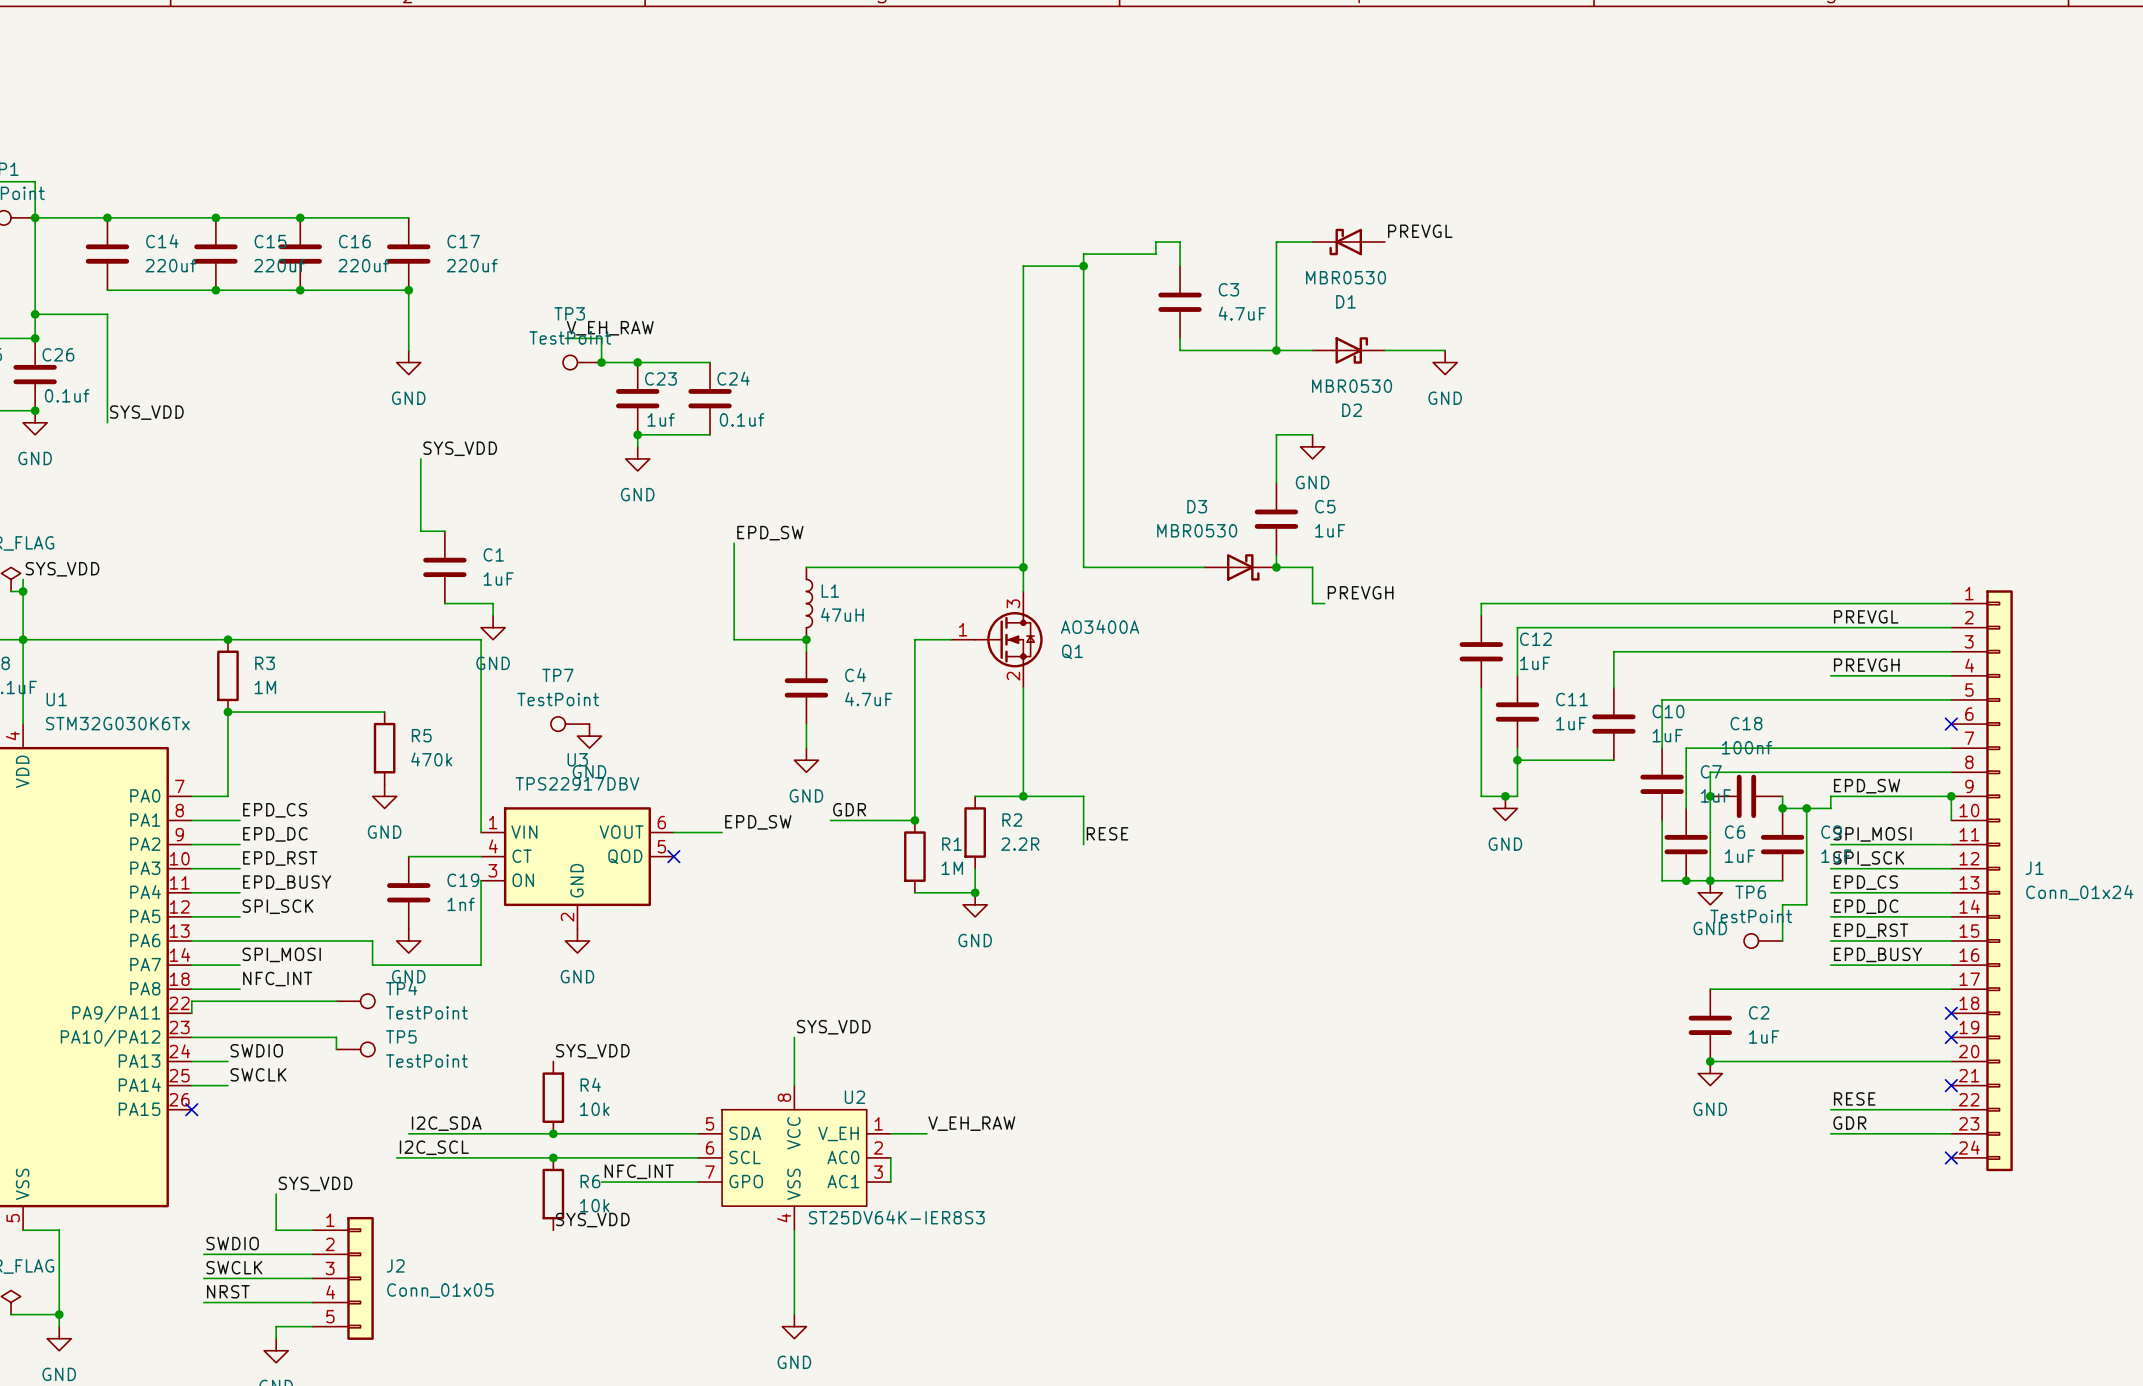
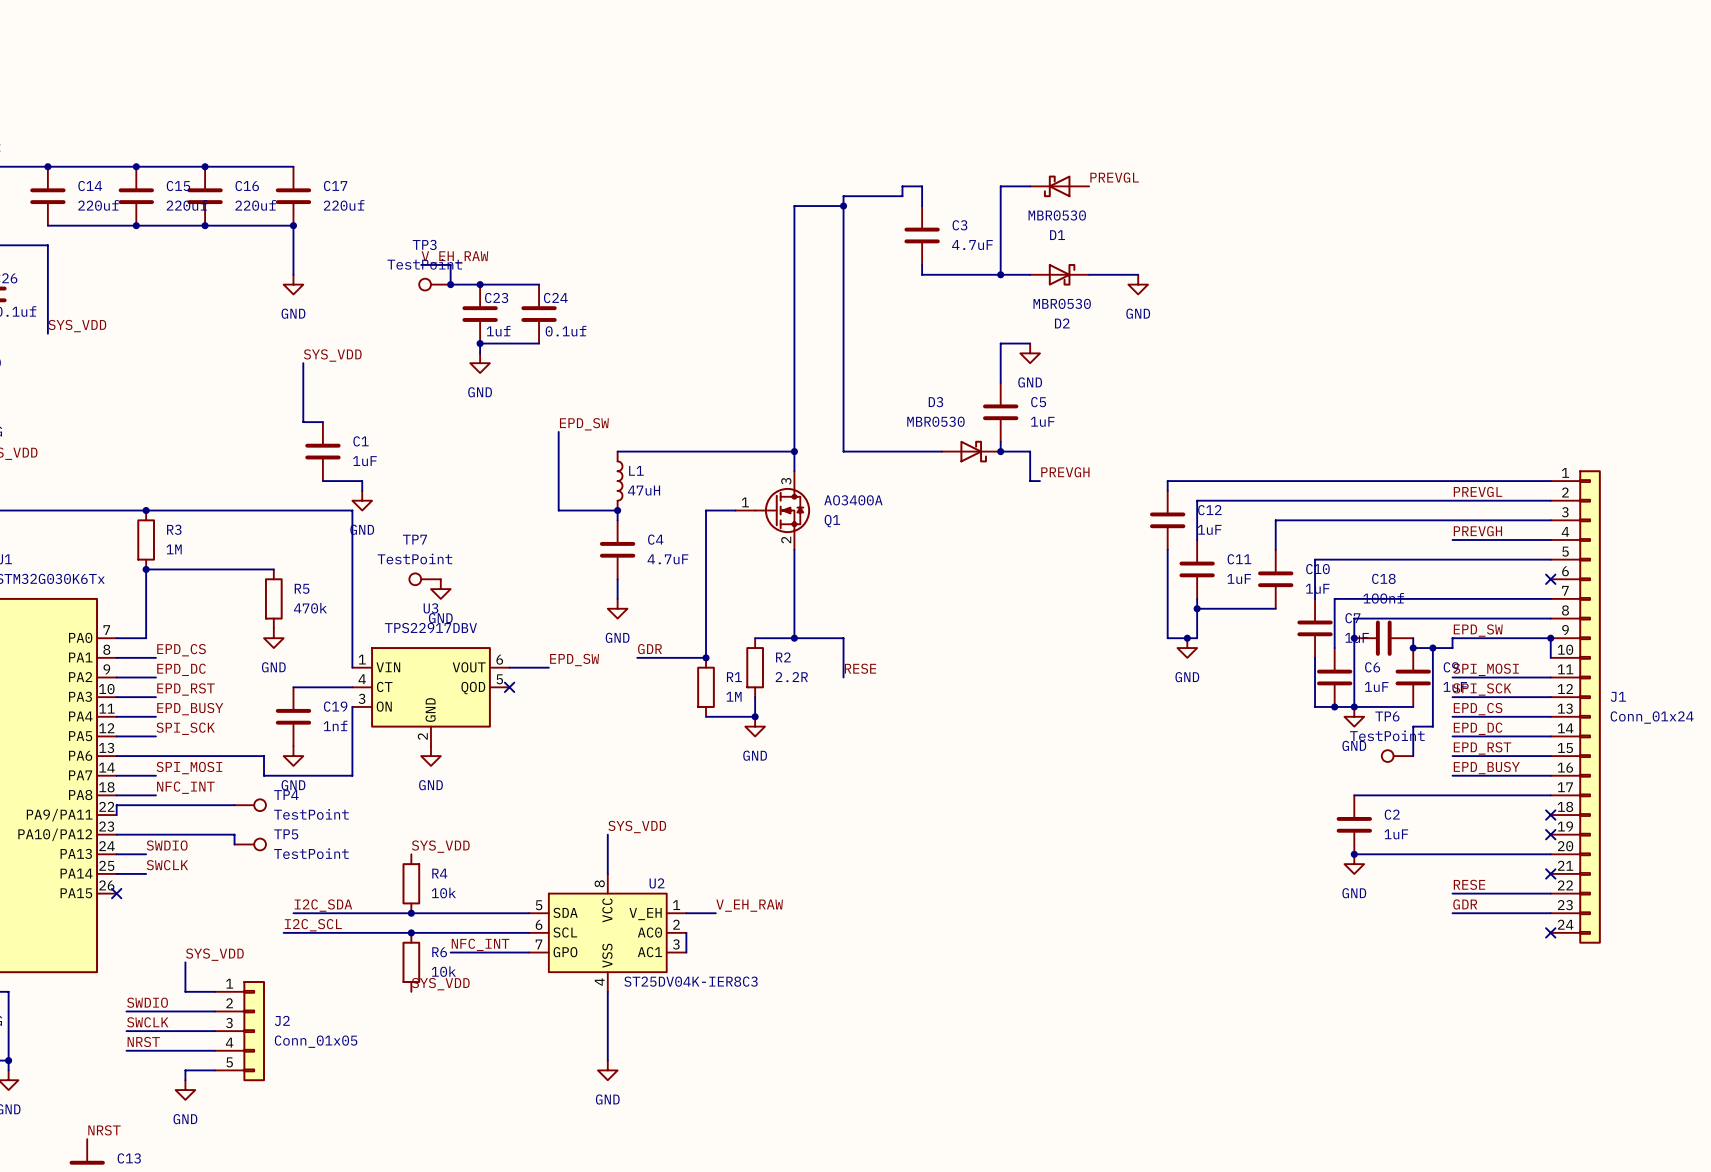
U2 value: ST25DV64K-IER8S3 (896, 1217) -> ST25DV04K-IER8C3 (691, 981)

